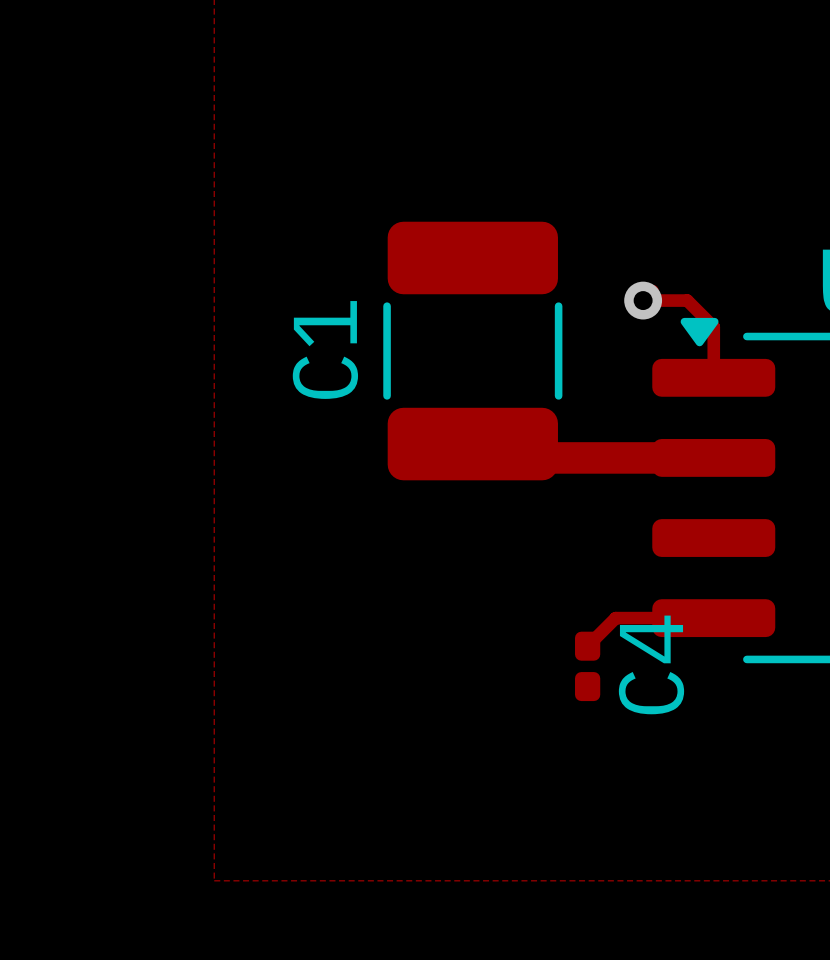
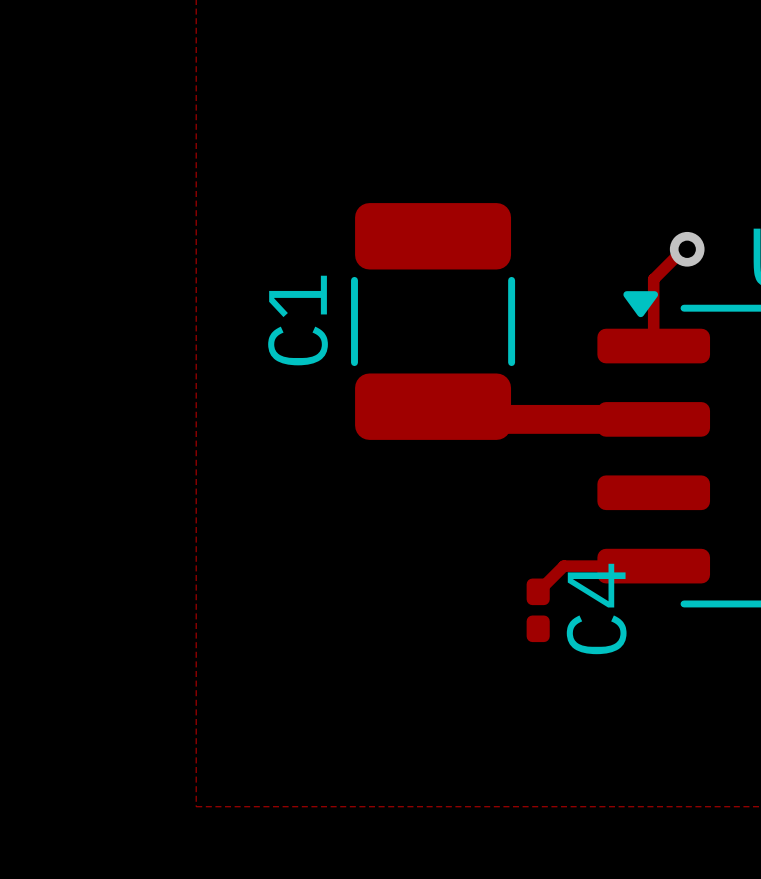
track: (652, 291) (643, 300) (687, 300) (713, 327) -> (687, 249) (683, 249) (653, 279) (653, 299)
via position: (643, 300) -> (687, 249)

